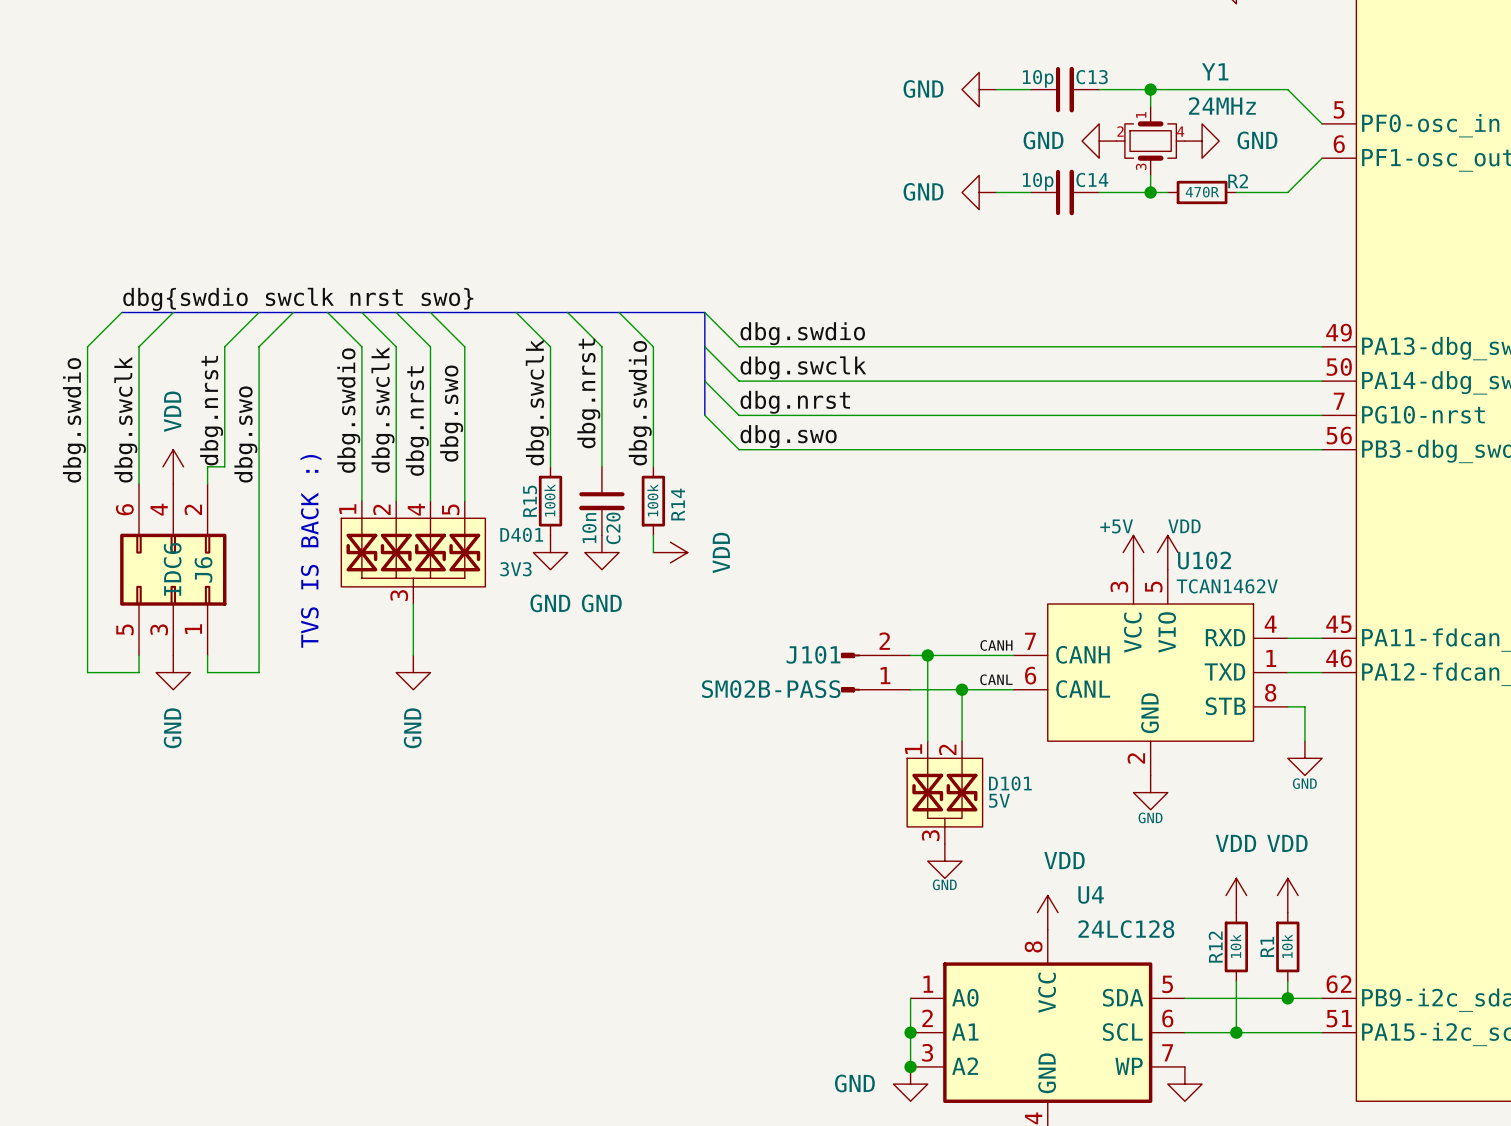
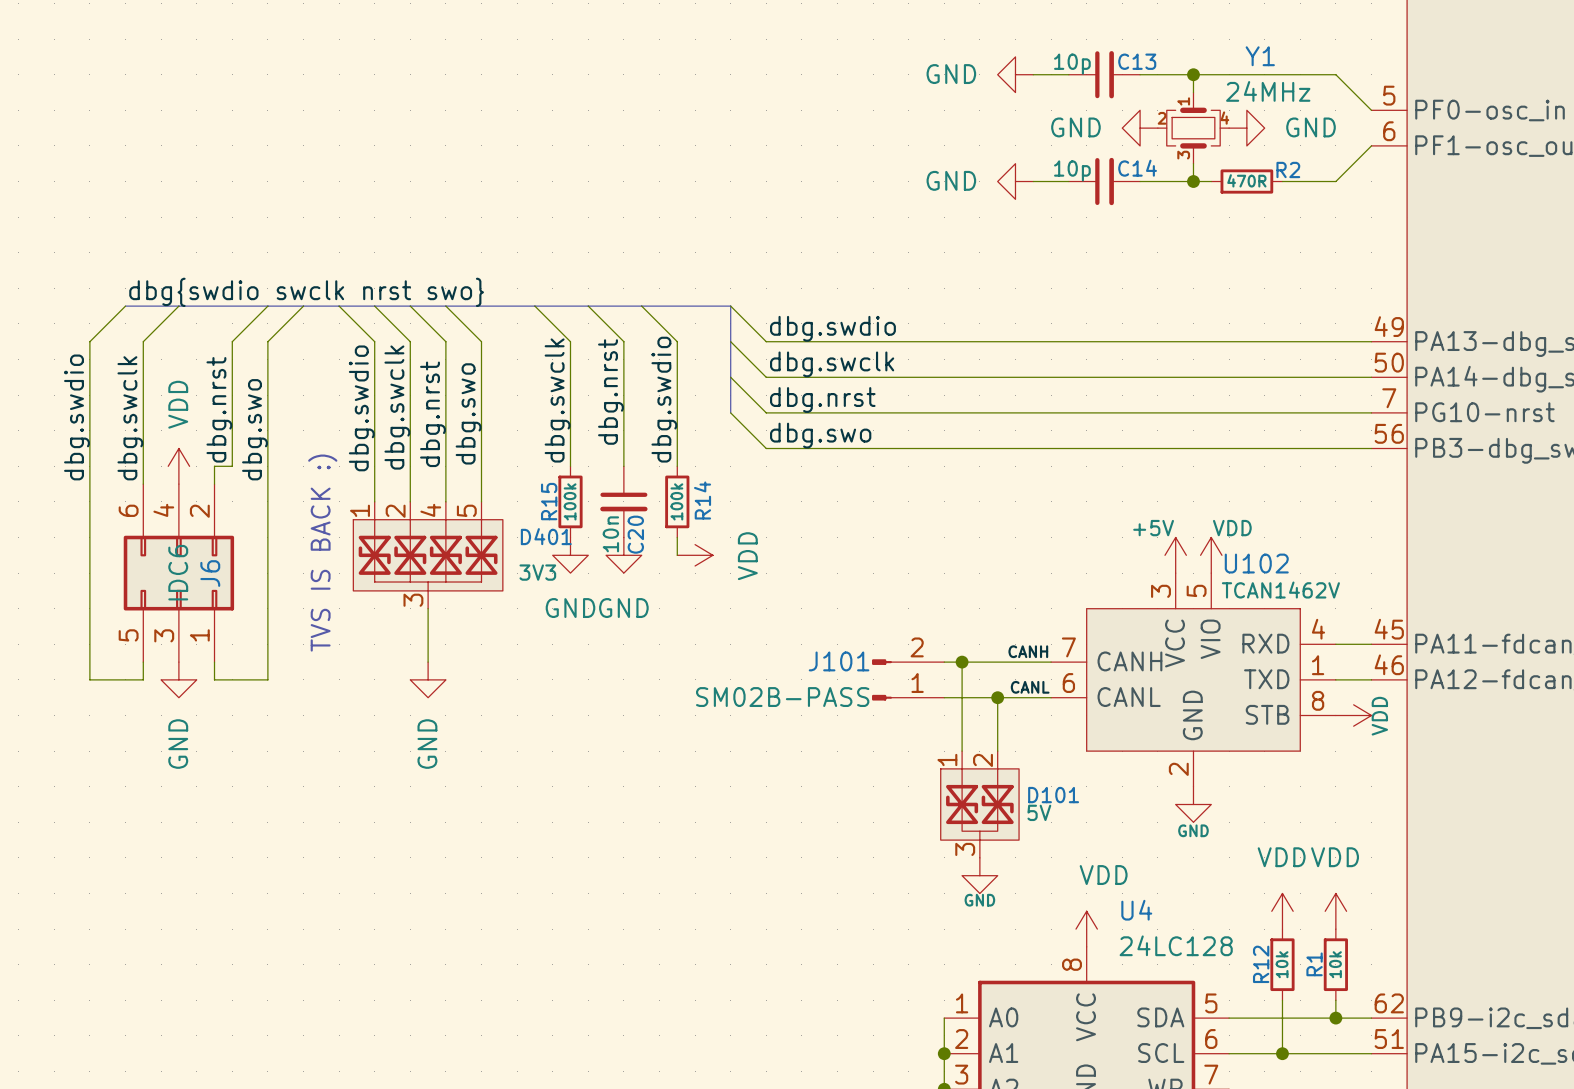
wire: (1287, 706) (1304, 706) (1304, 741) -> none
power symbol: none -> VDD (1353, 715)
power symbol: GND (1304, 758) -> none

